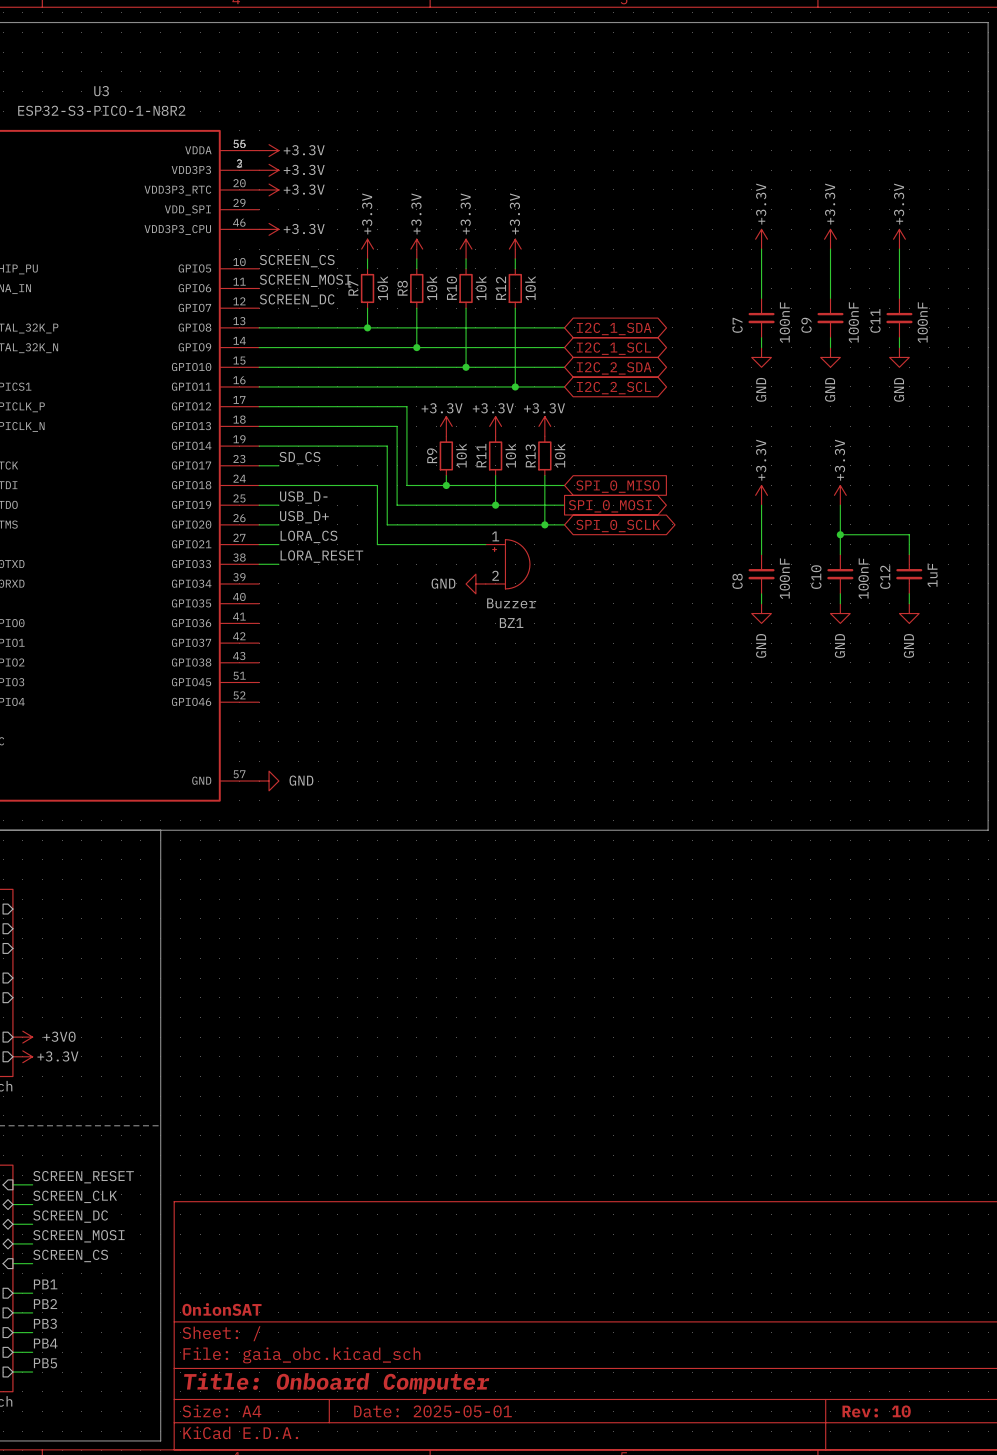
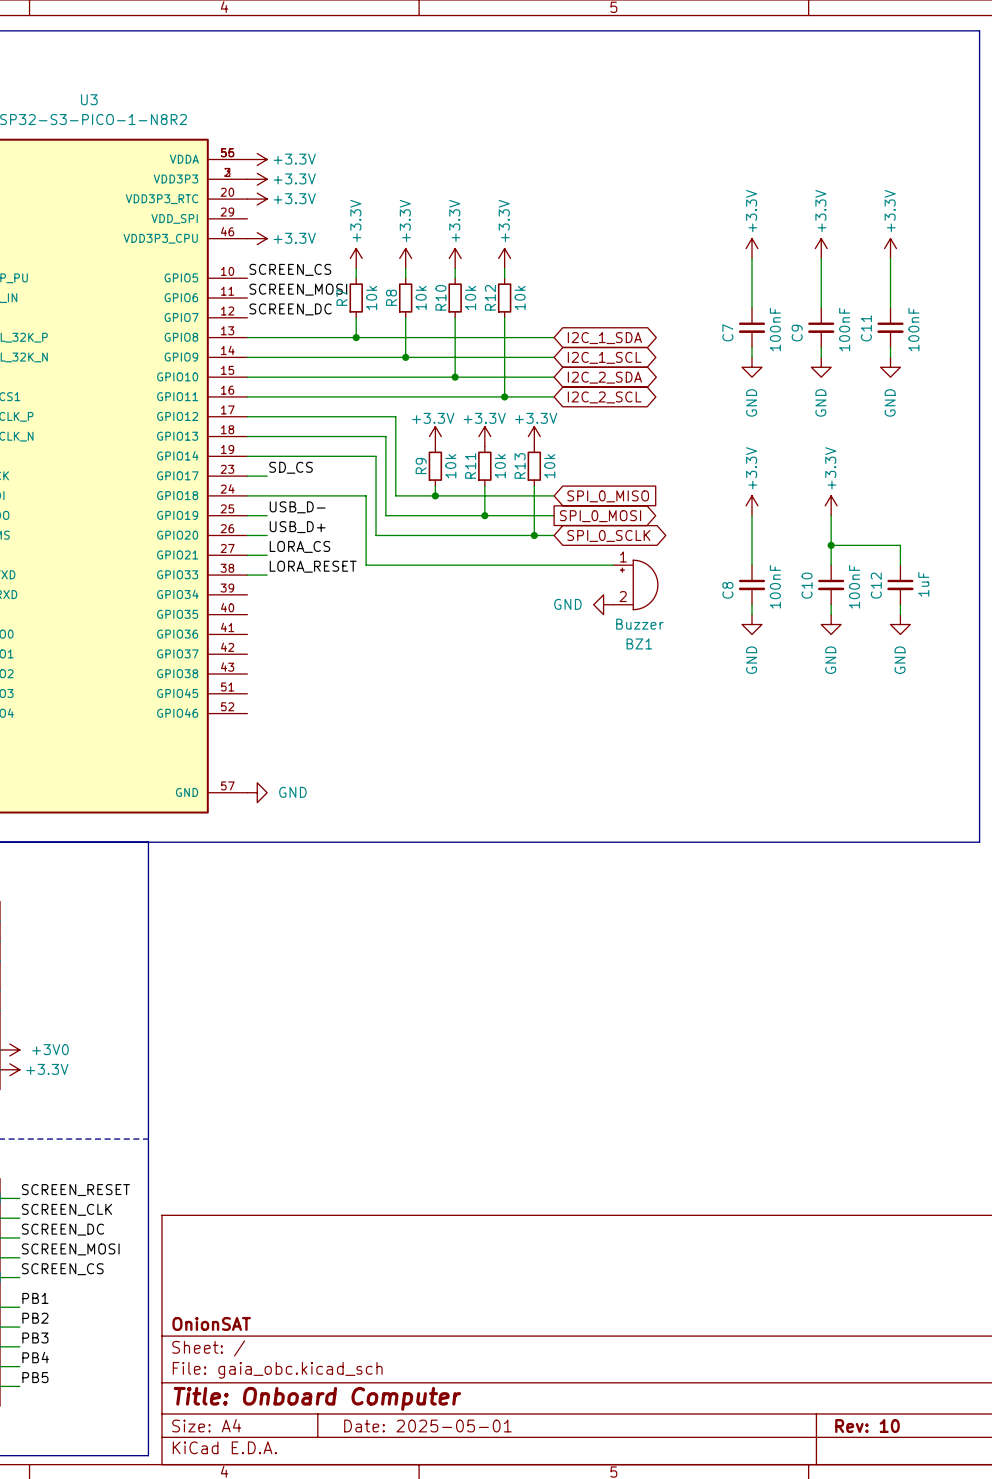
wire: (377, 544) (485, 544) -> (366, 555) (366, 565) (613, 565)
BZ1 position: (507, 564) -> (635, 584)
power symbol position: GND (475, 583) -> GND (603, 604)

